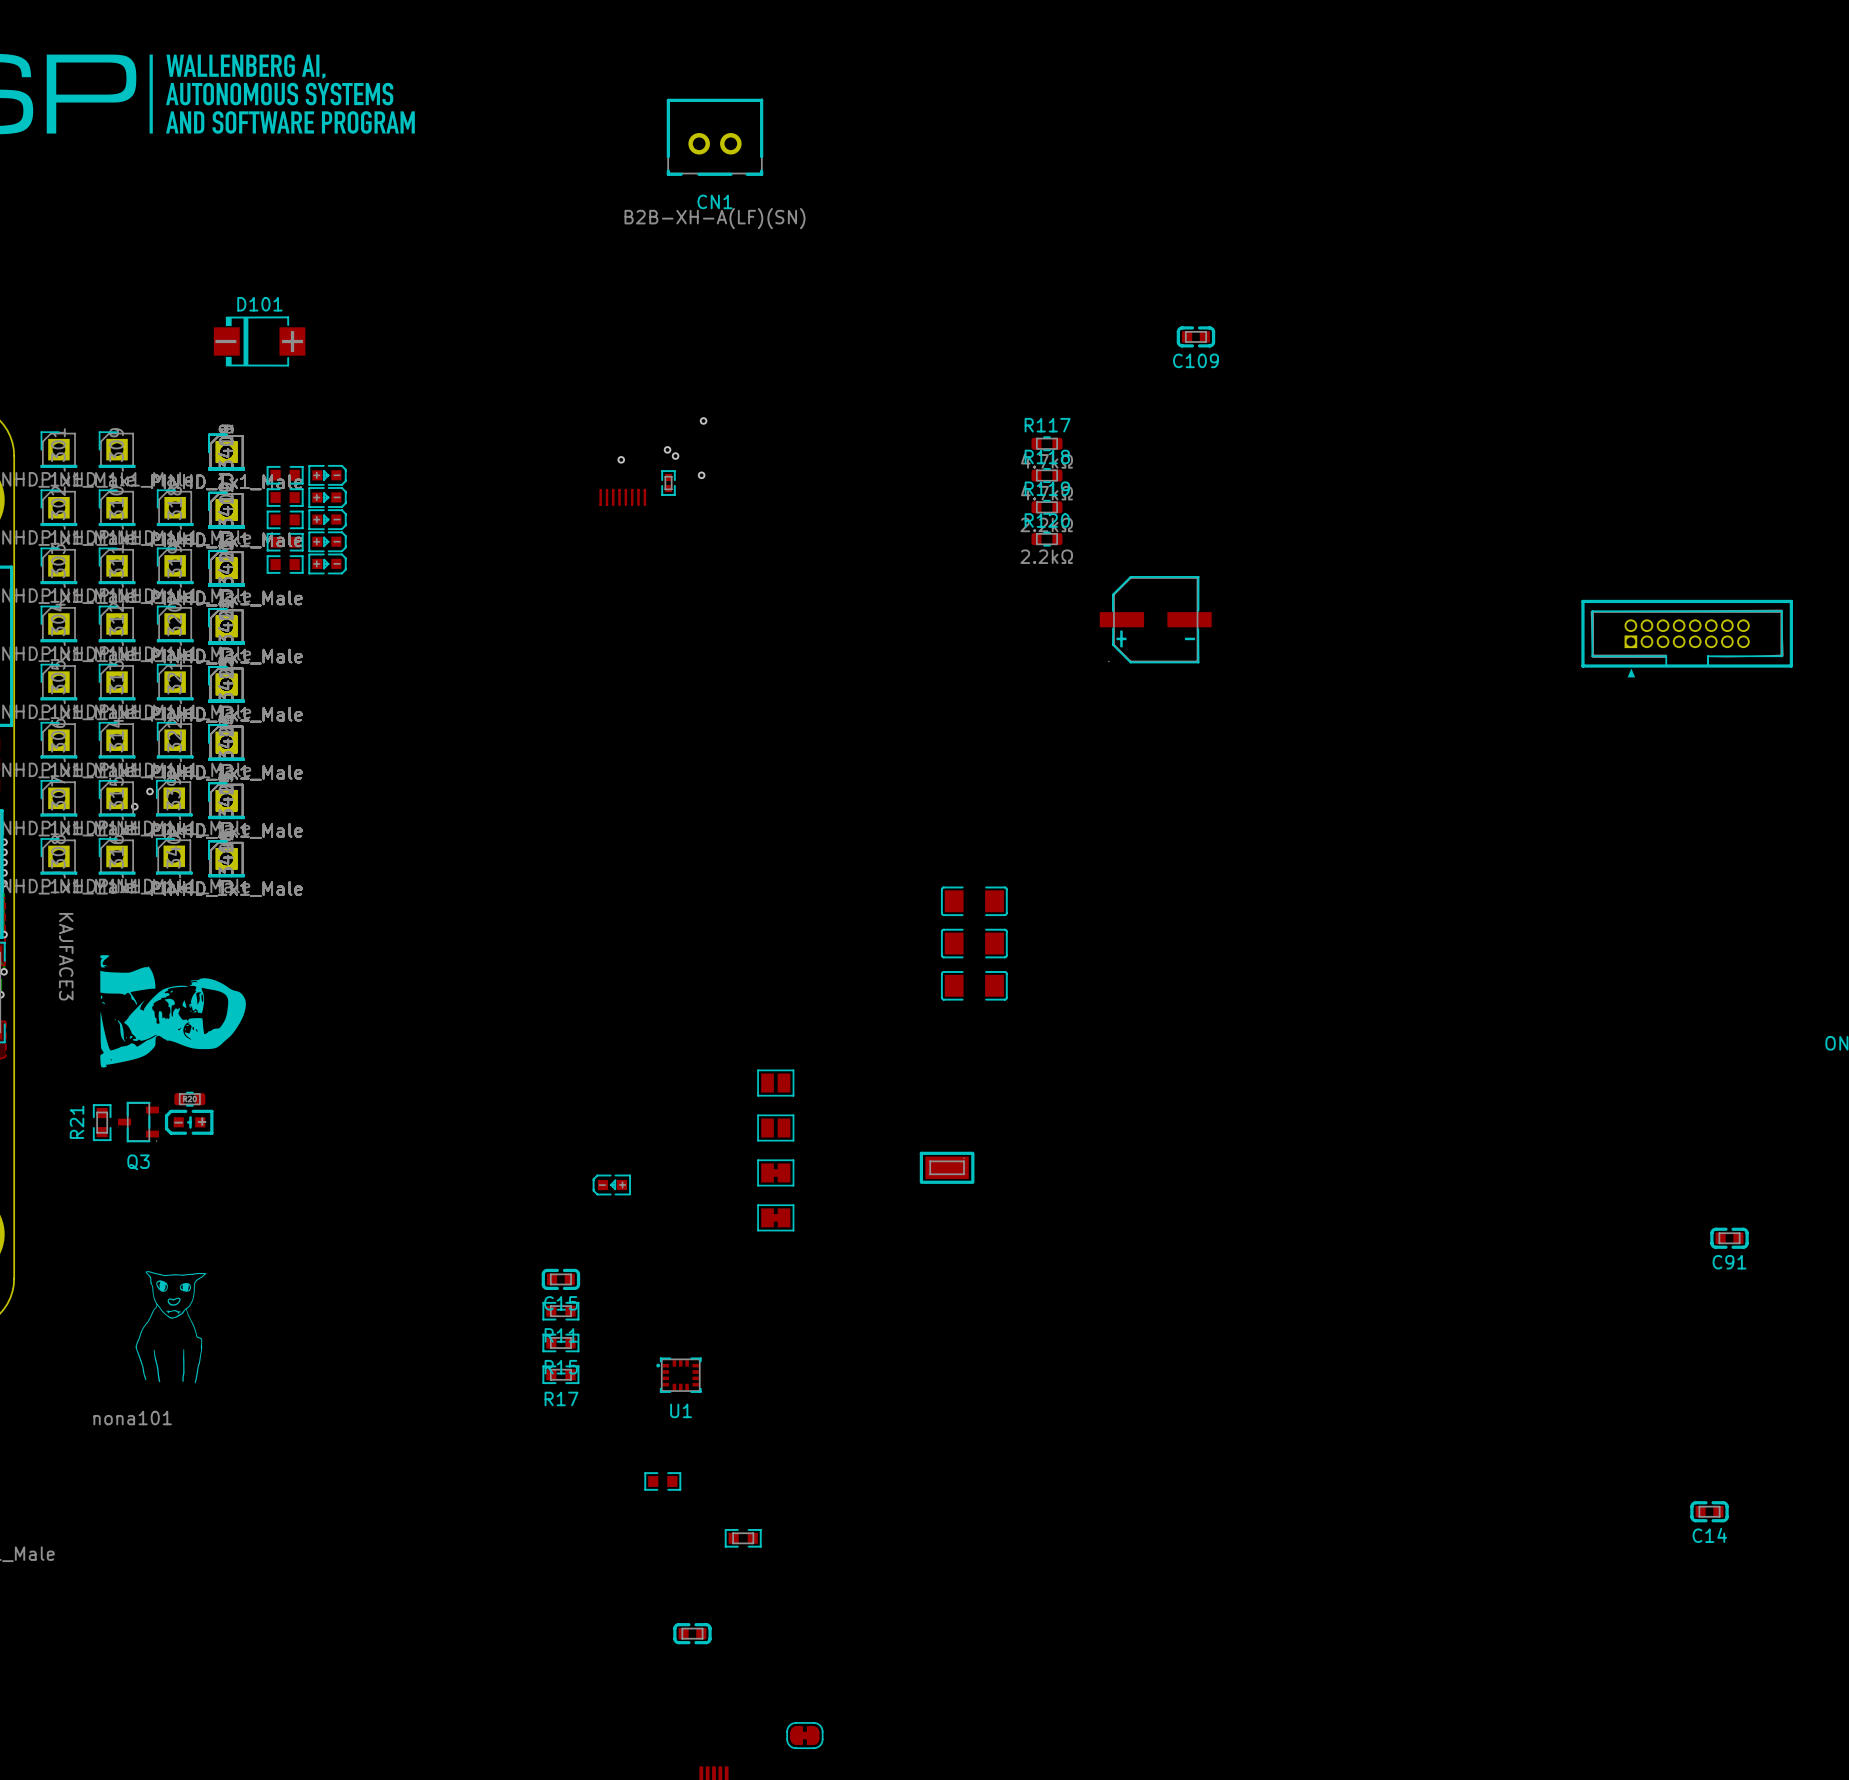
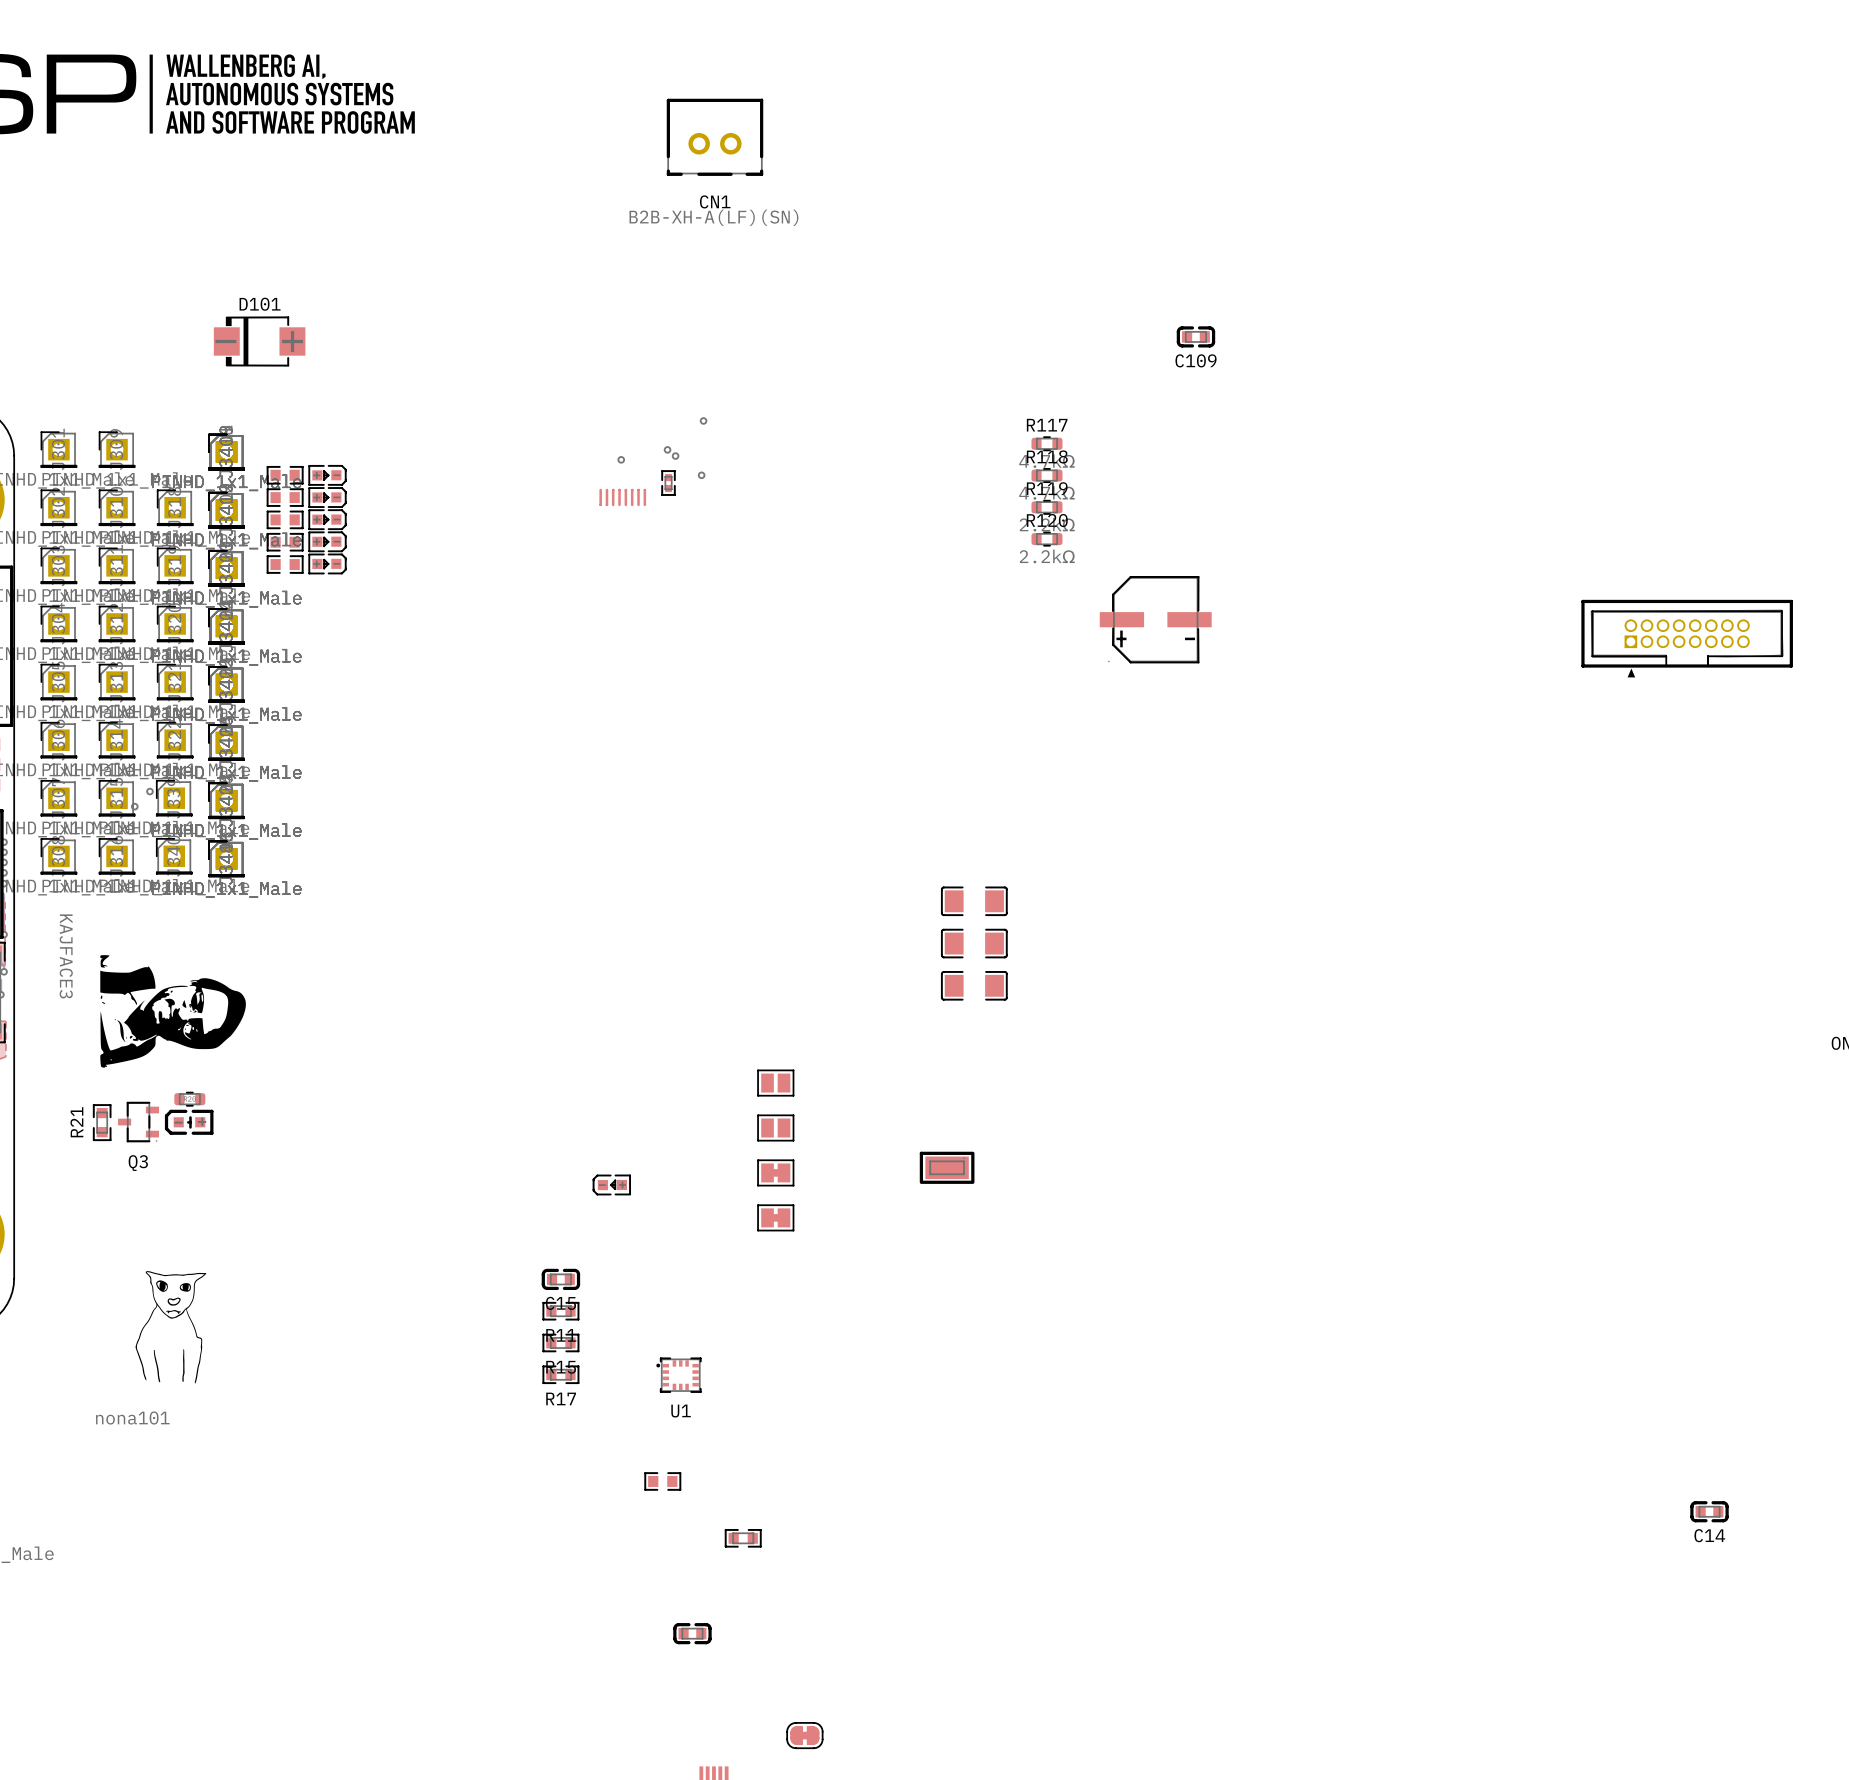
C91: (1729, 1238) -> none

